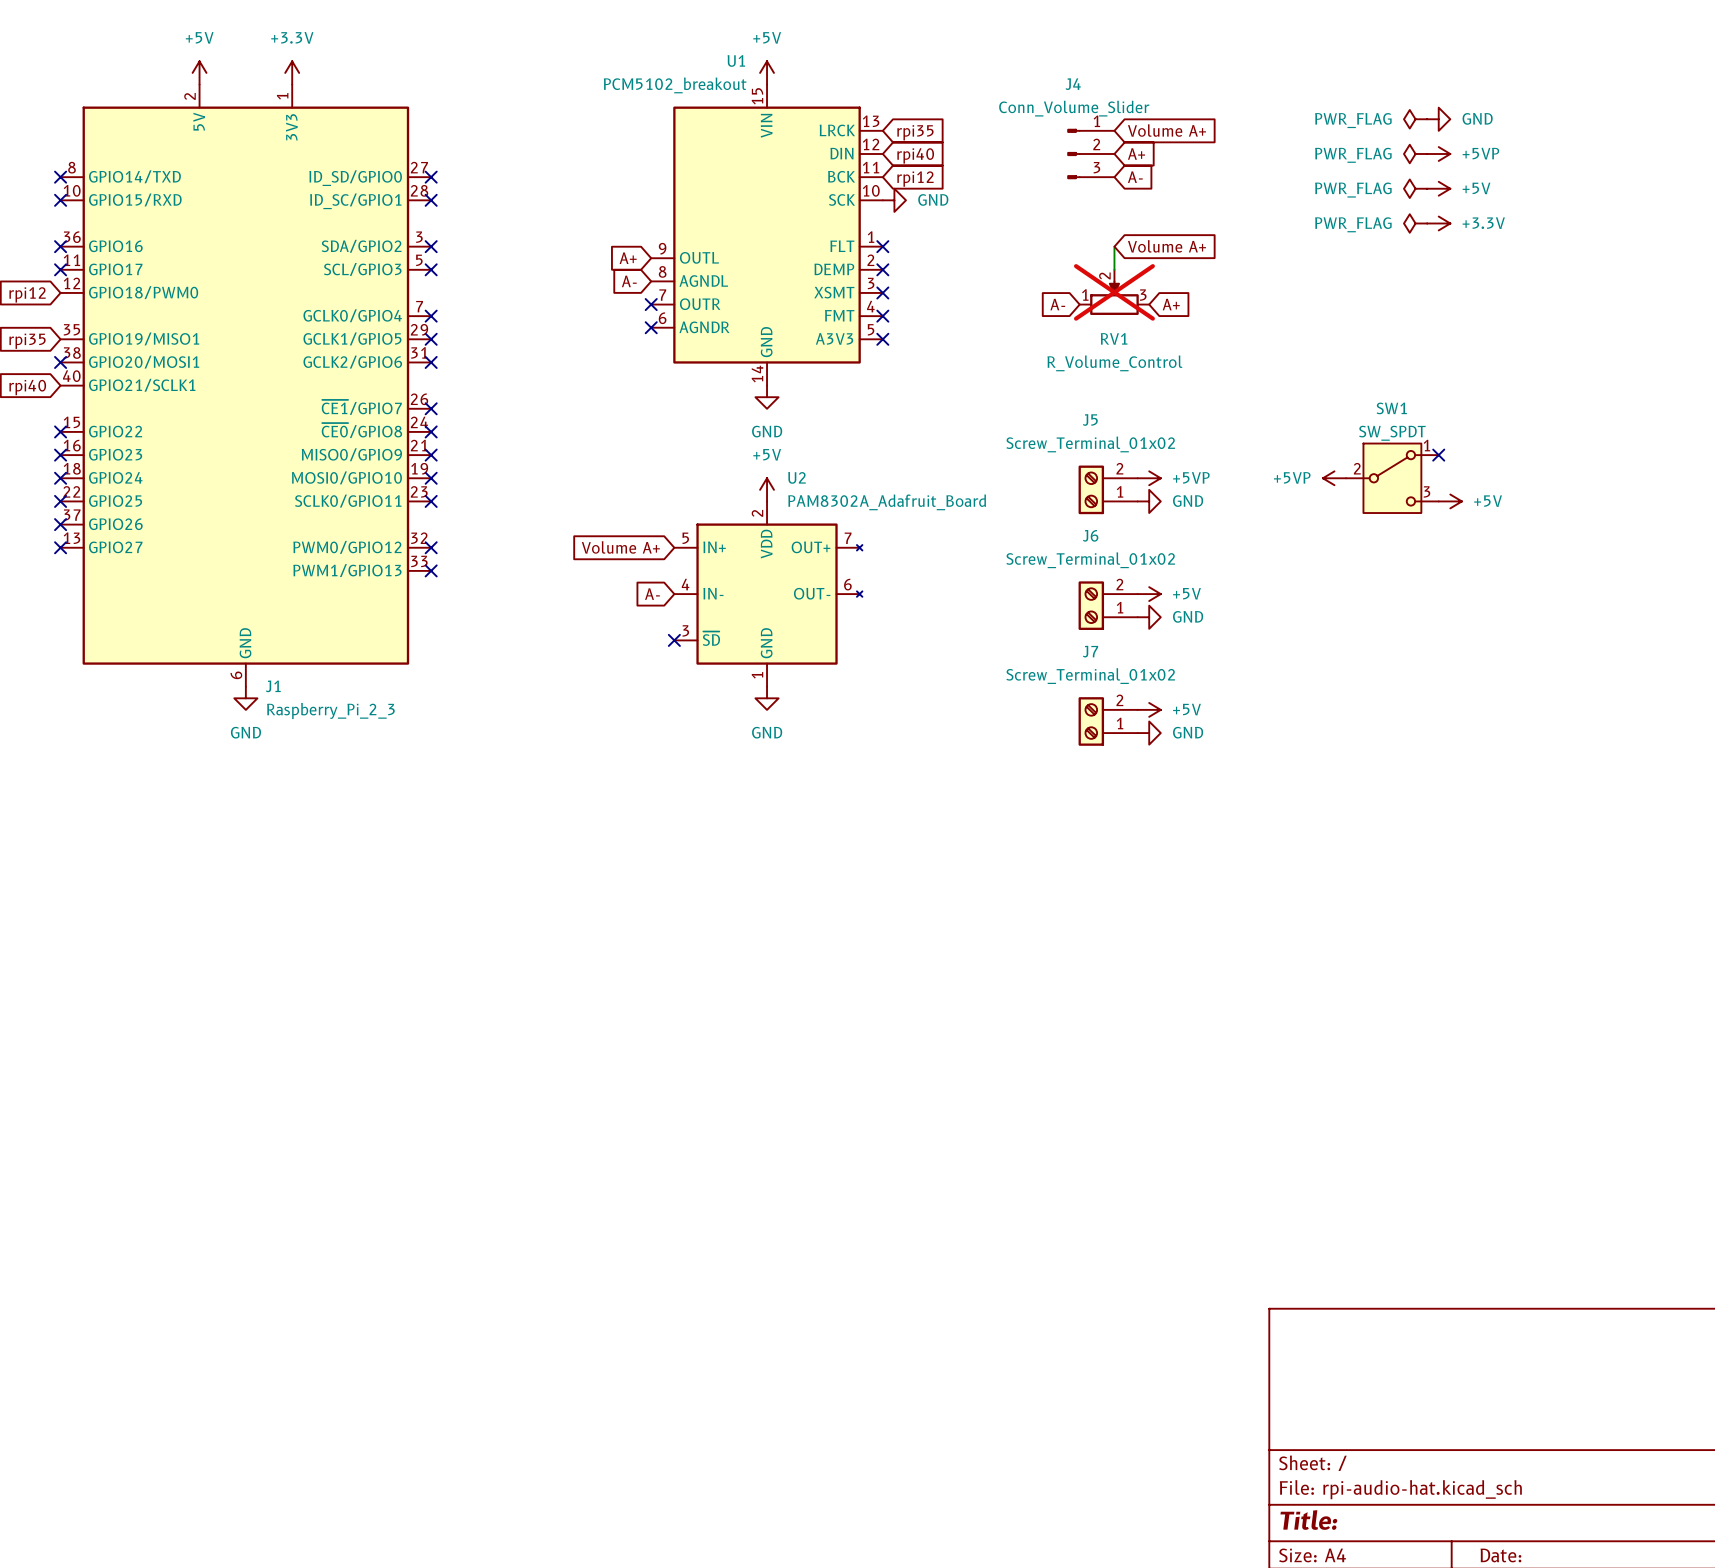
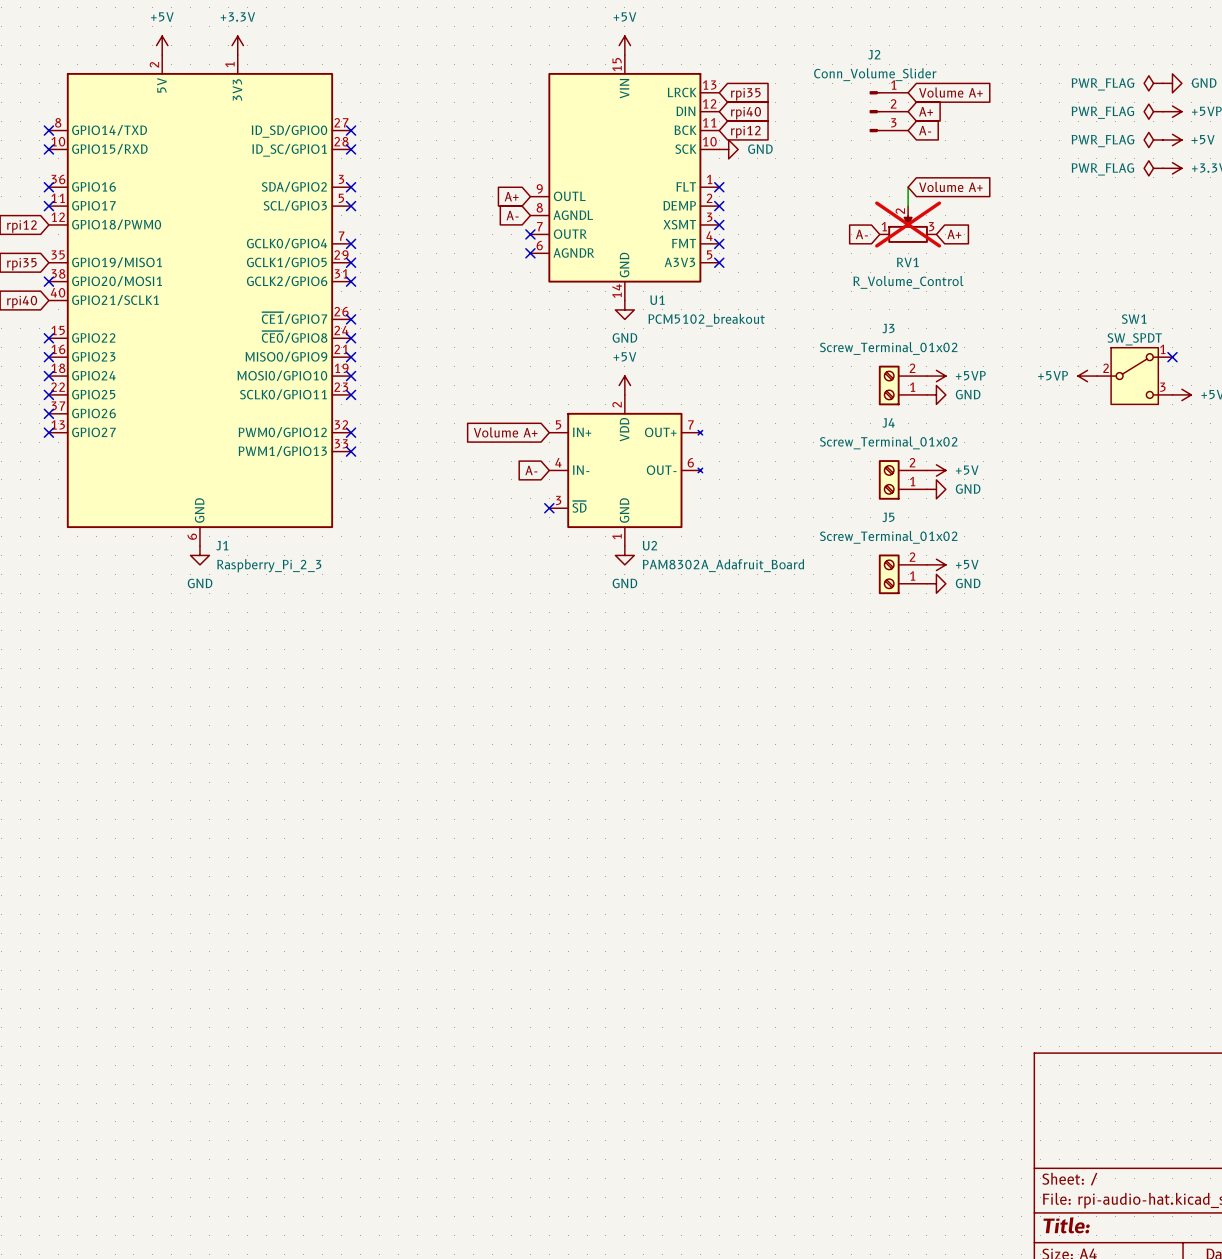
U1 name position: U1 (736, 60) -> U1 (657, 300)
J4 name: J4 (1073, 84) -> J2 (874, 54)
U1 value position: PCM5102_breakout (675, 85) -> PCM5102_breakout (706, 320)
J5 name: J5 (1090, 420) -> J3 (888, 328)
U2 name position: U2 (796, 477) -> U2 (649, 545)
U2 value position: PAM8302A_Adafruit_Board (887, 502) -> PAM8302A_Adafruit_Board (723, 565)
J6 name: J6 (1090, 535) -> J4 (888, 422)
J7 name: J7 (1090, 651) -> J5 (888, 517)

